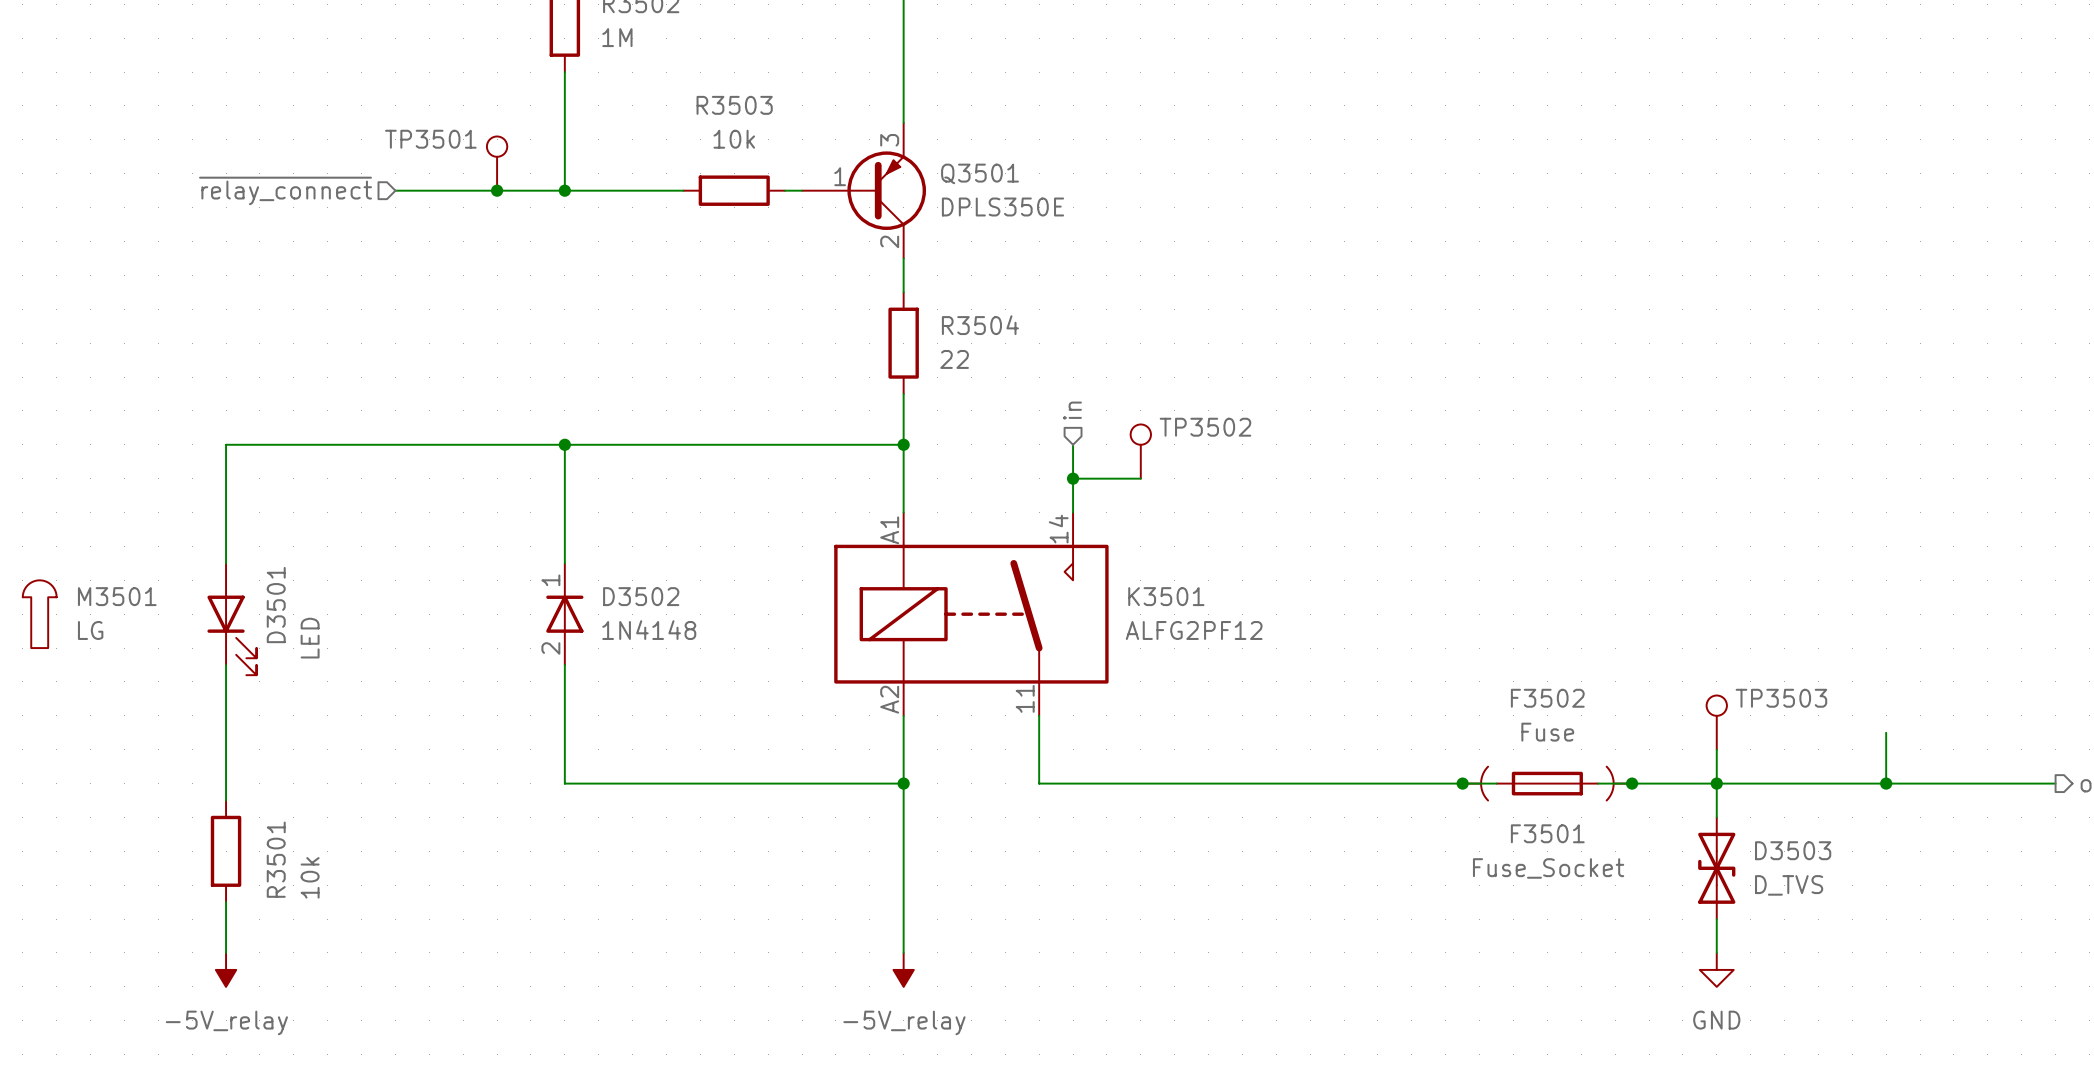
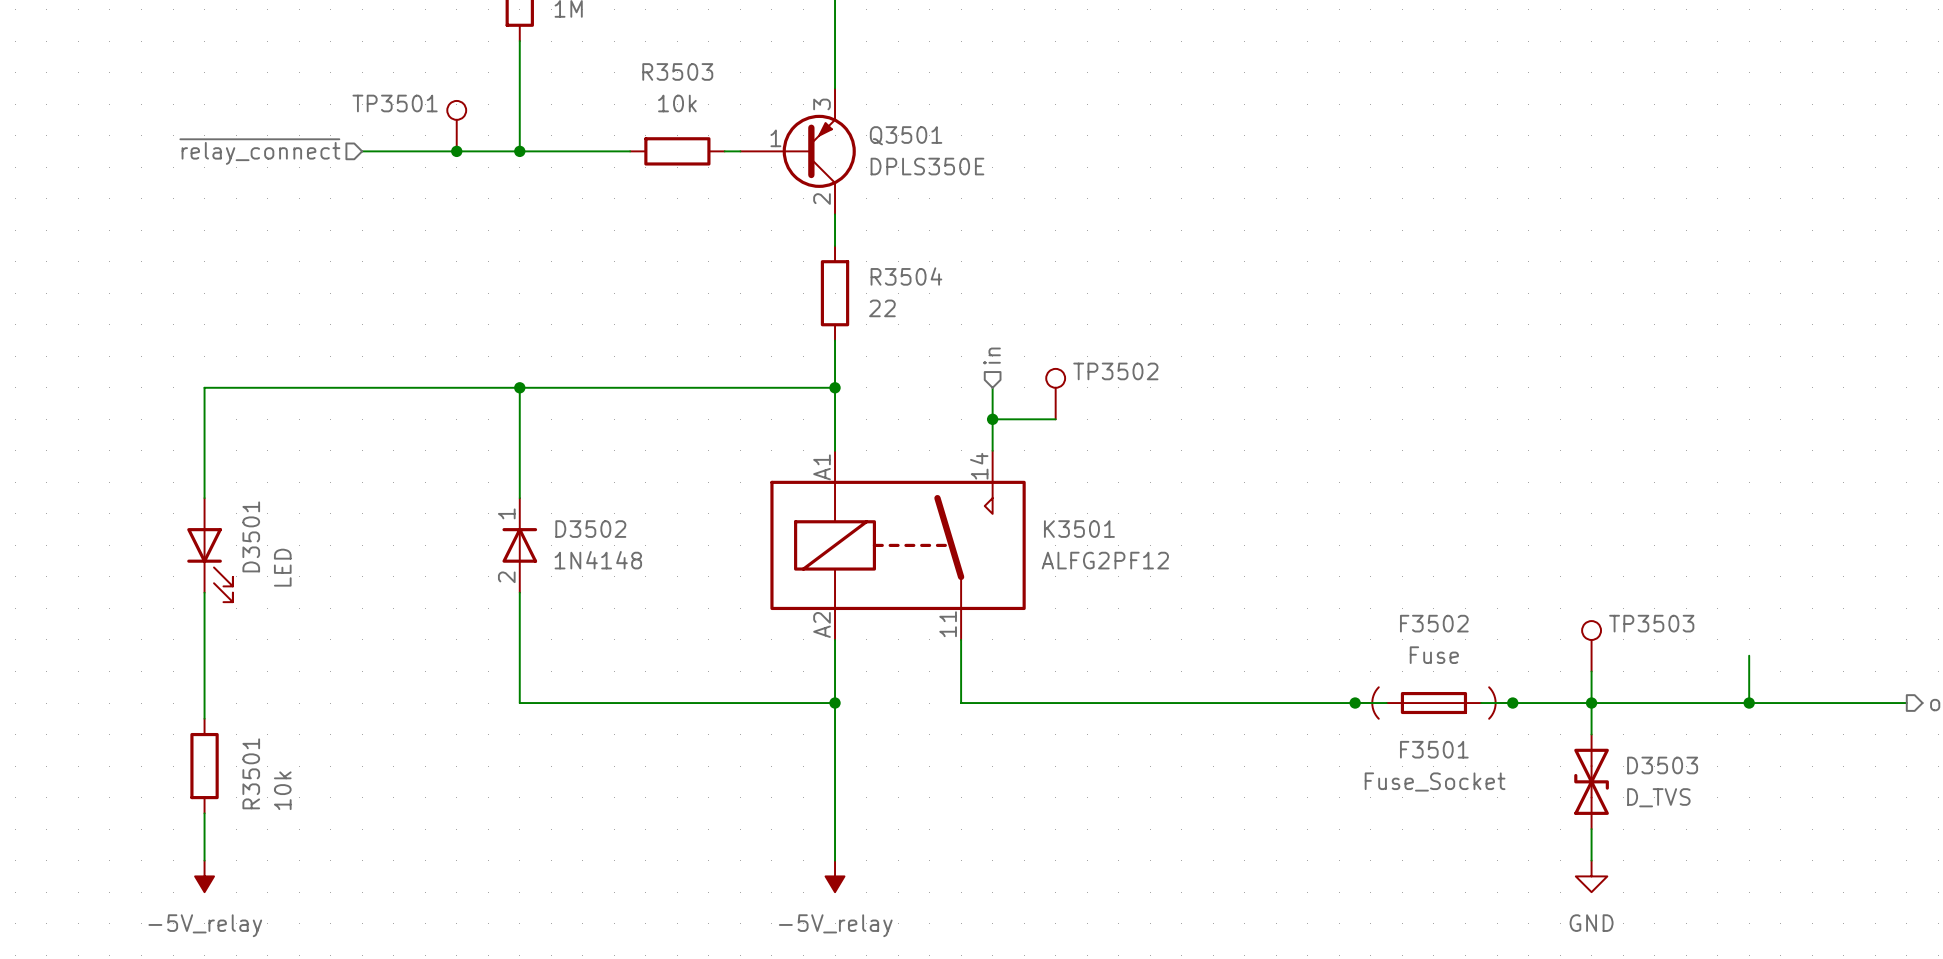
M3501: LG (39, 614) -> none

